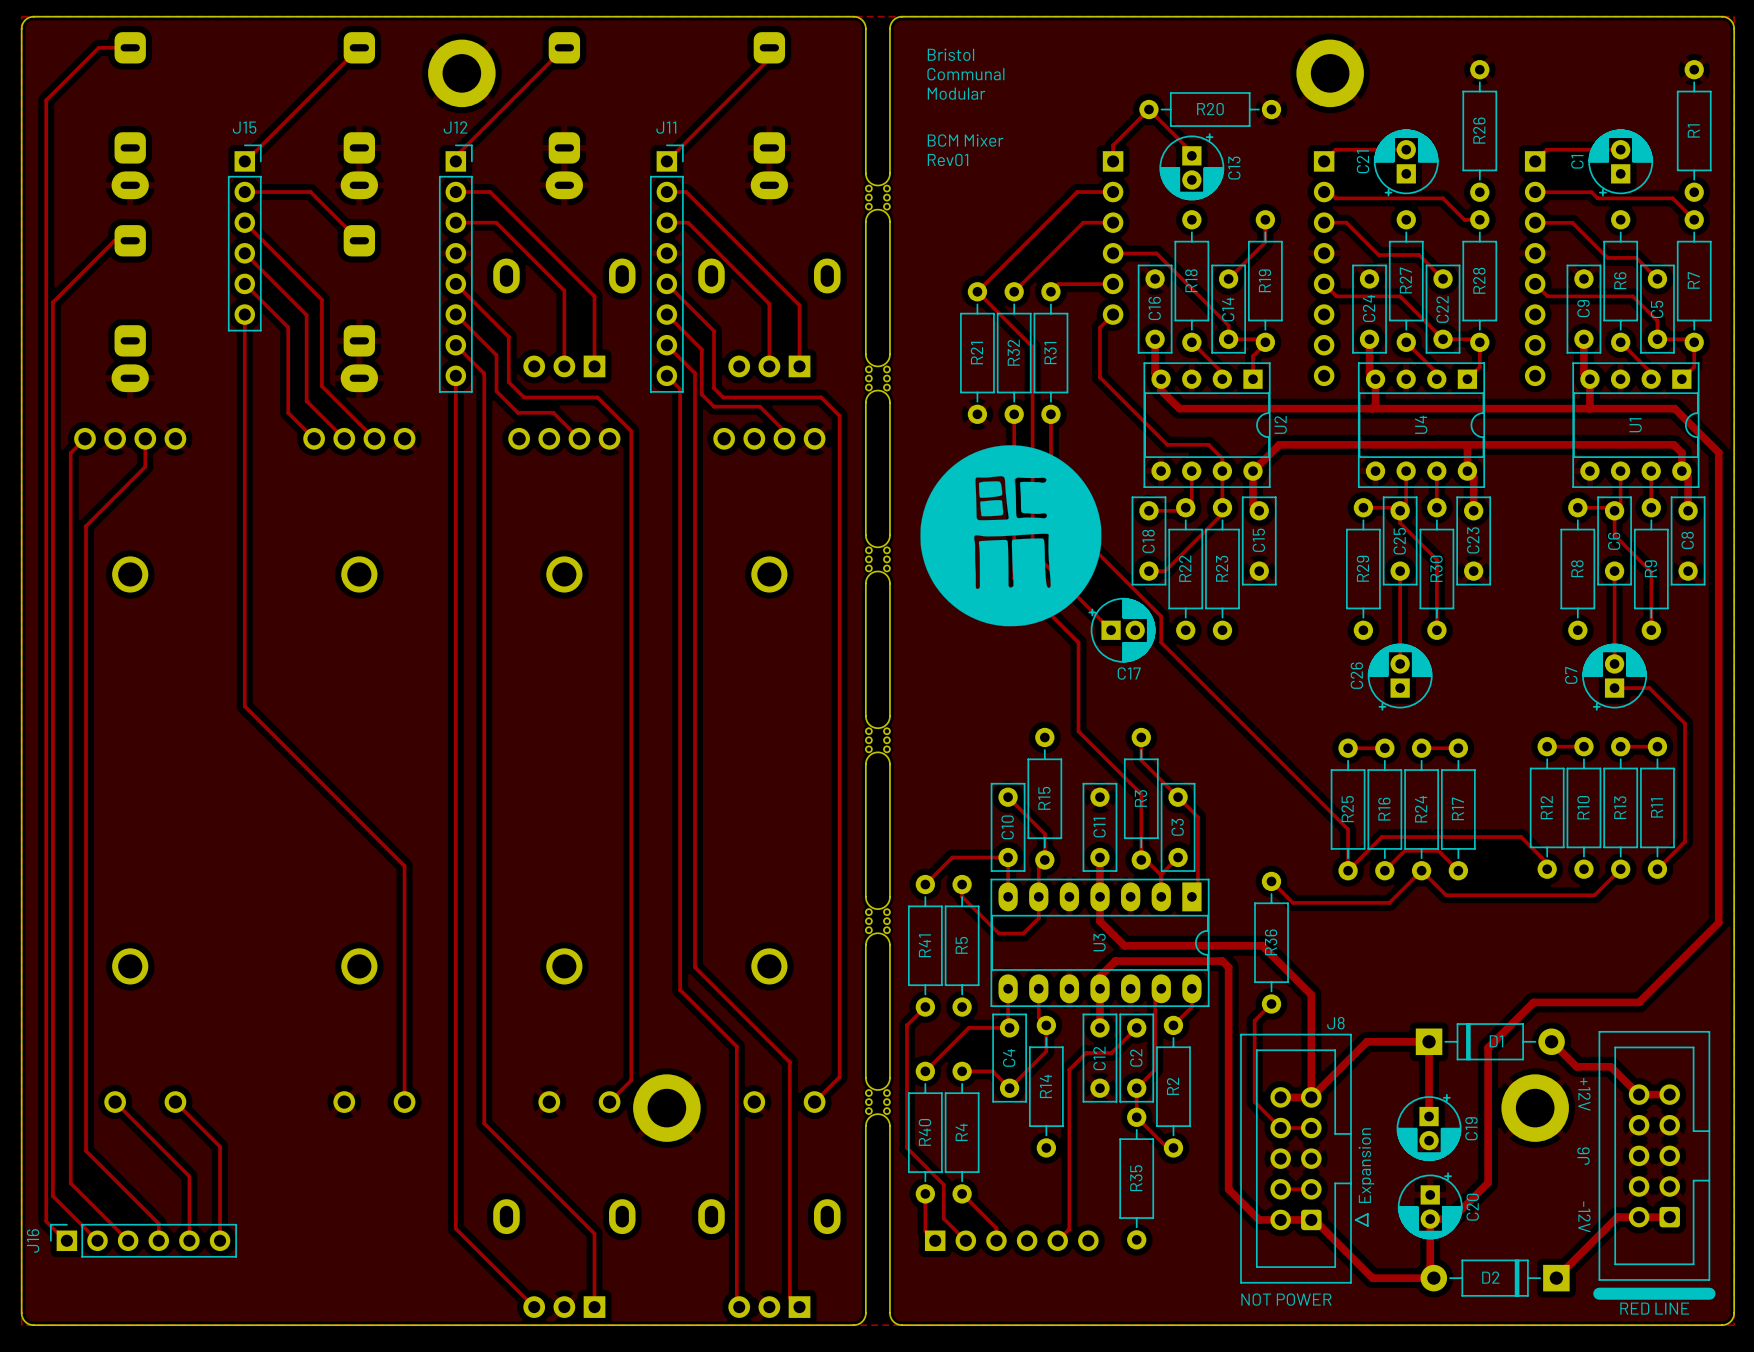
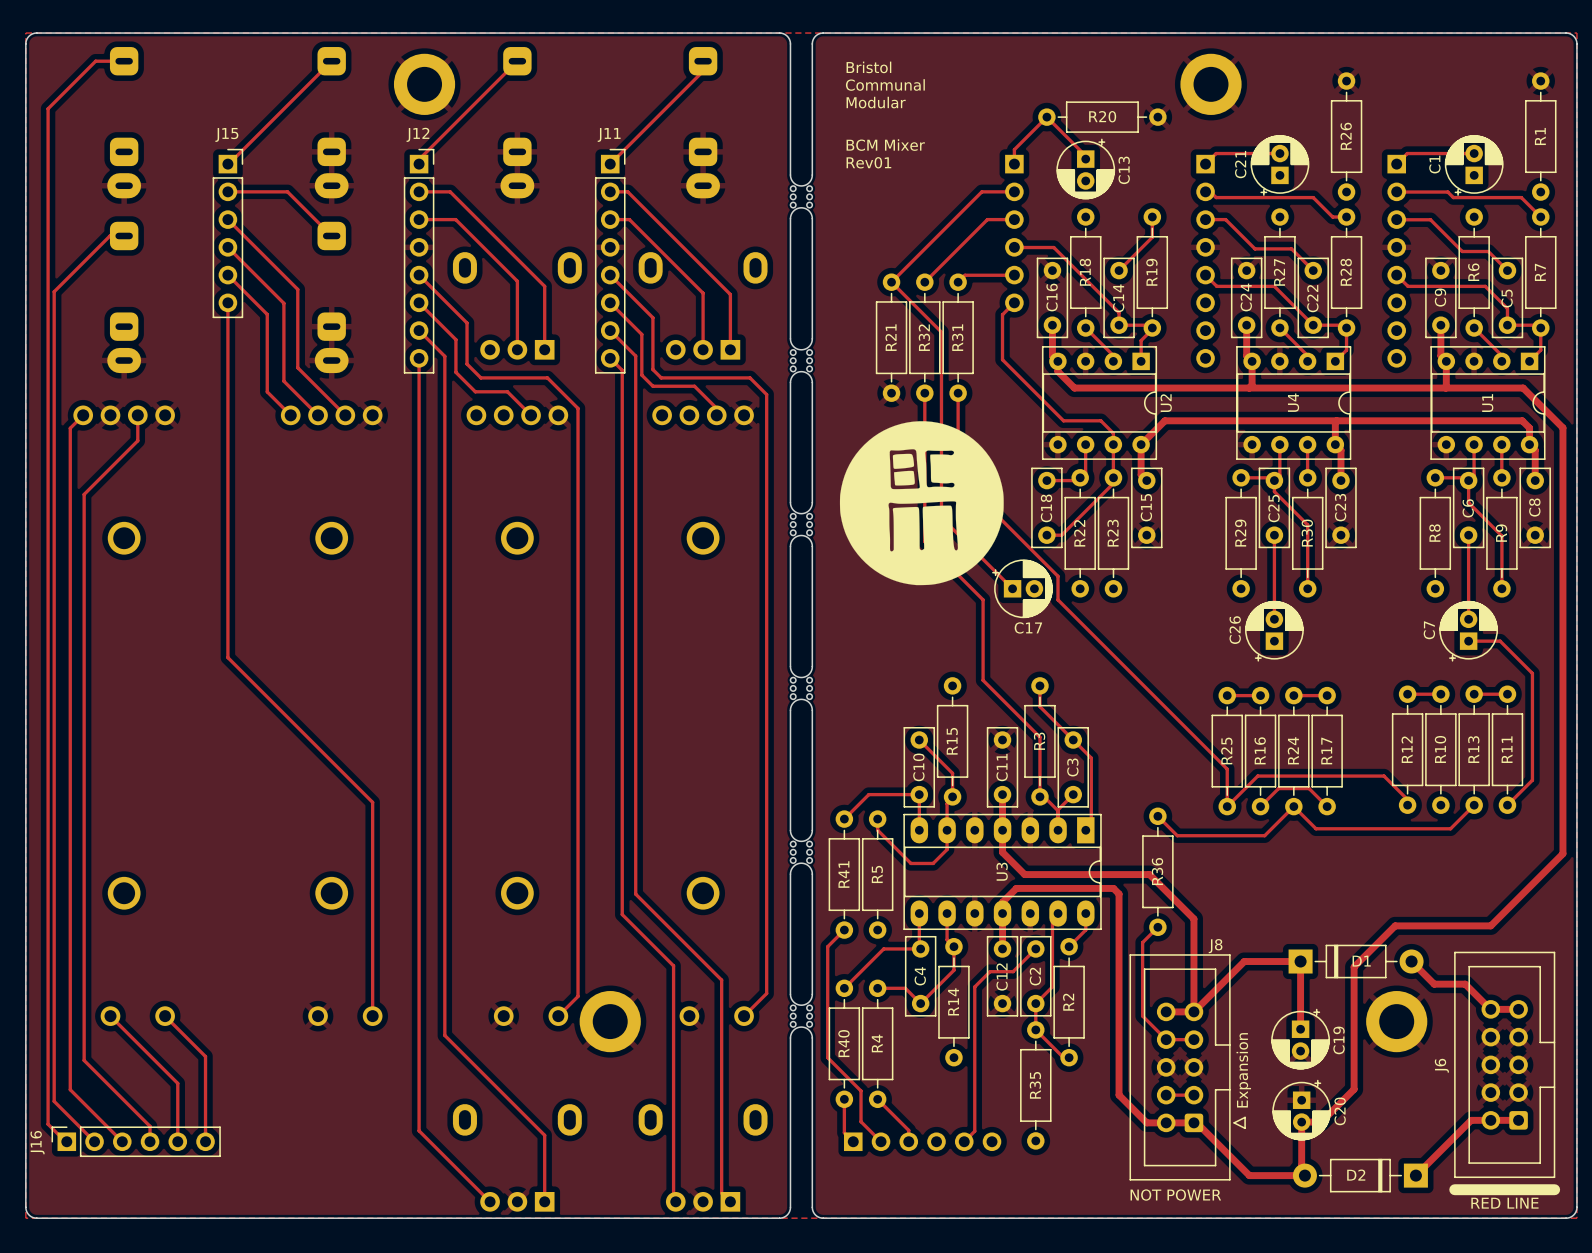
J6 text: +12V (1584, 1094) -> none
J6 text: -12V (1584, 1216) -> none

